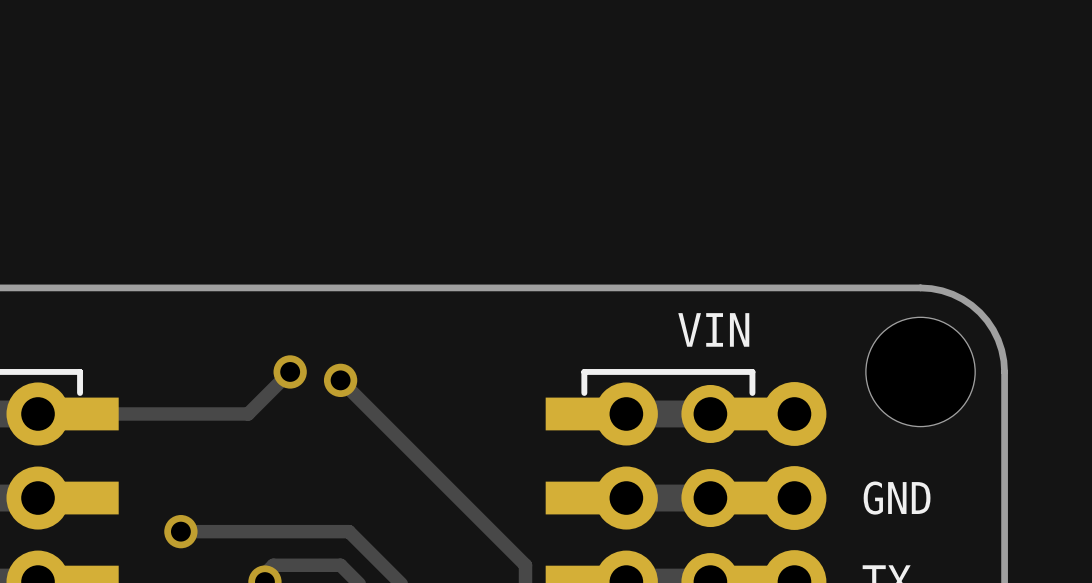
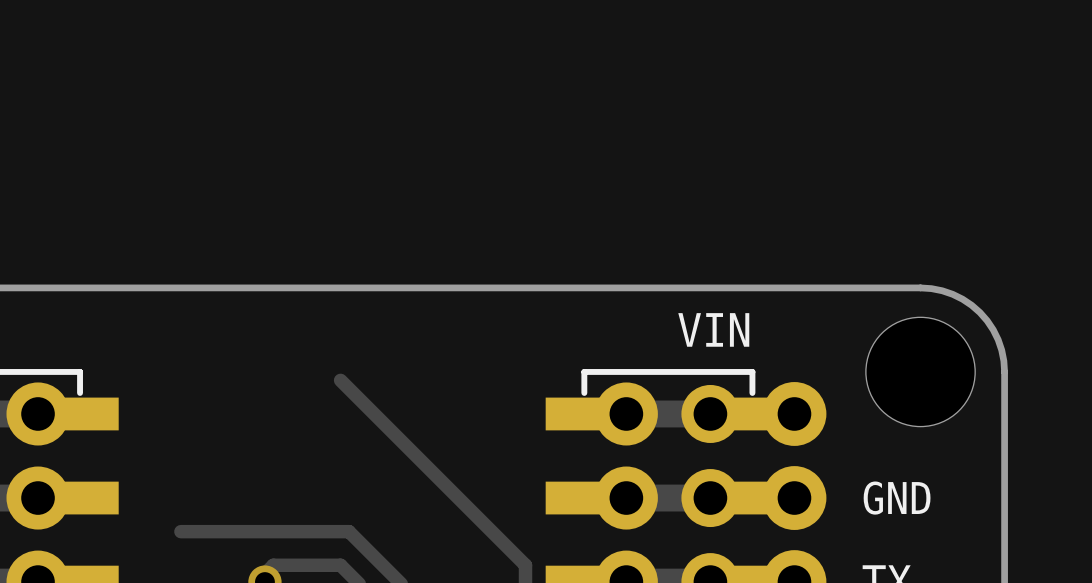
track: (290, 371) (248, 413) (38, 413) -> none
via: (290, 371) -> none
via: (340, 380) -> none
via: (180, 531) -> none

